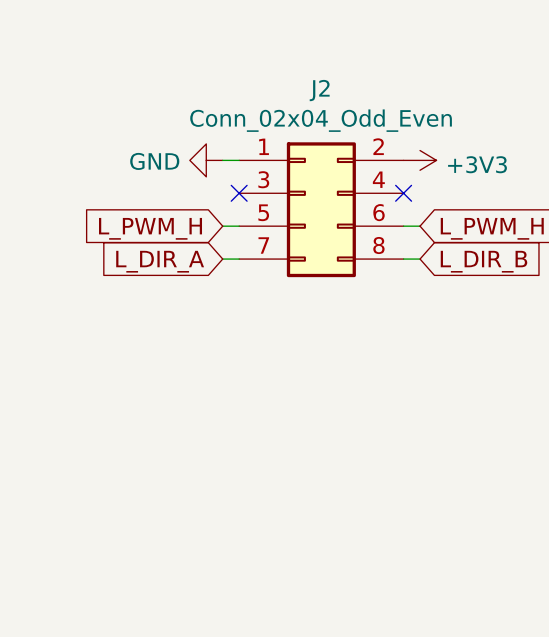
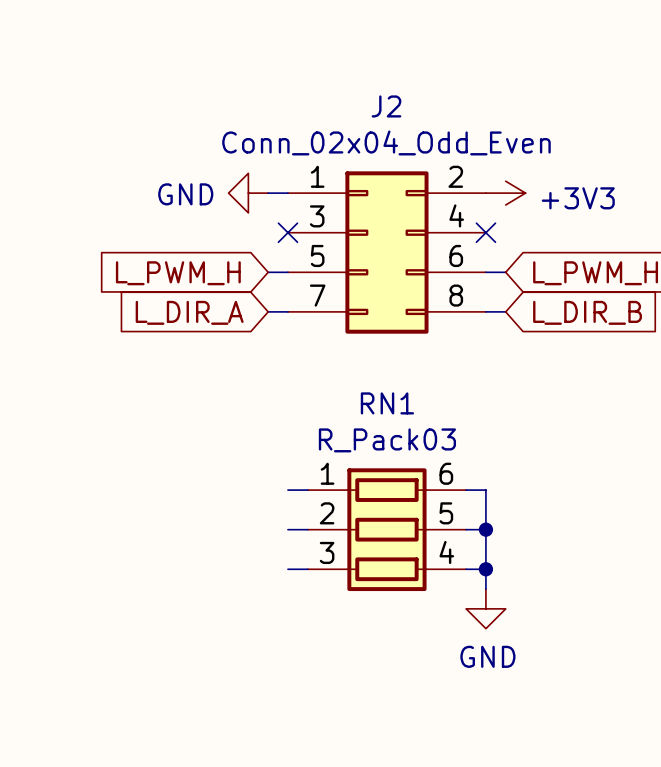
wire: none -> (287, 490) (307, 490)
wire: none -> (466, 490) (485, 490) (485, 589)
wire: none -> (287, 529) (307, 529)
RN1: none -> R_Pack03 (386, 529)
wire: none -> (466, 529) (485, 529)
junction: none -> (485, 529)
wire: none -> (287, 569) (307, 569)
wire: none -> (466, 569) (485, 569)
junction: none -> (485, 569)
power symbol: none -> GND (485, 608)

